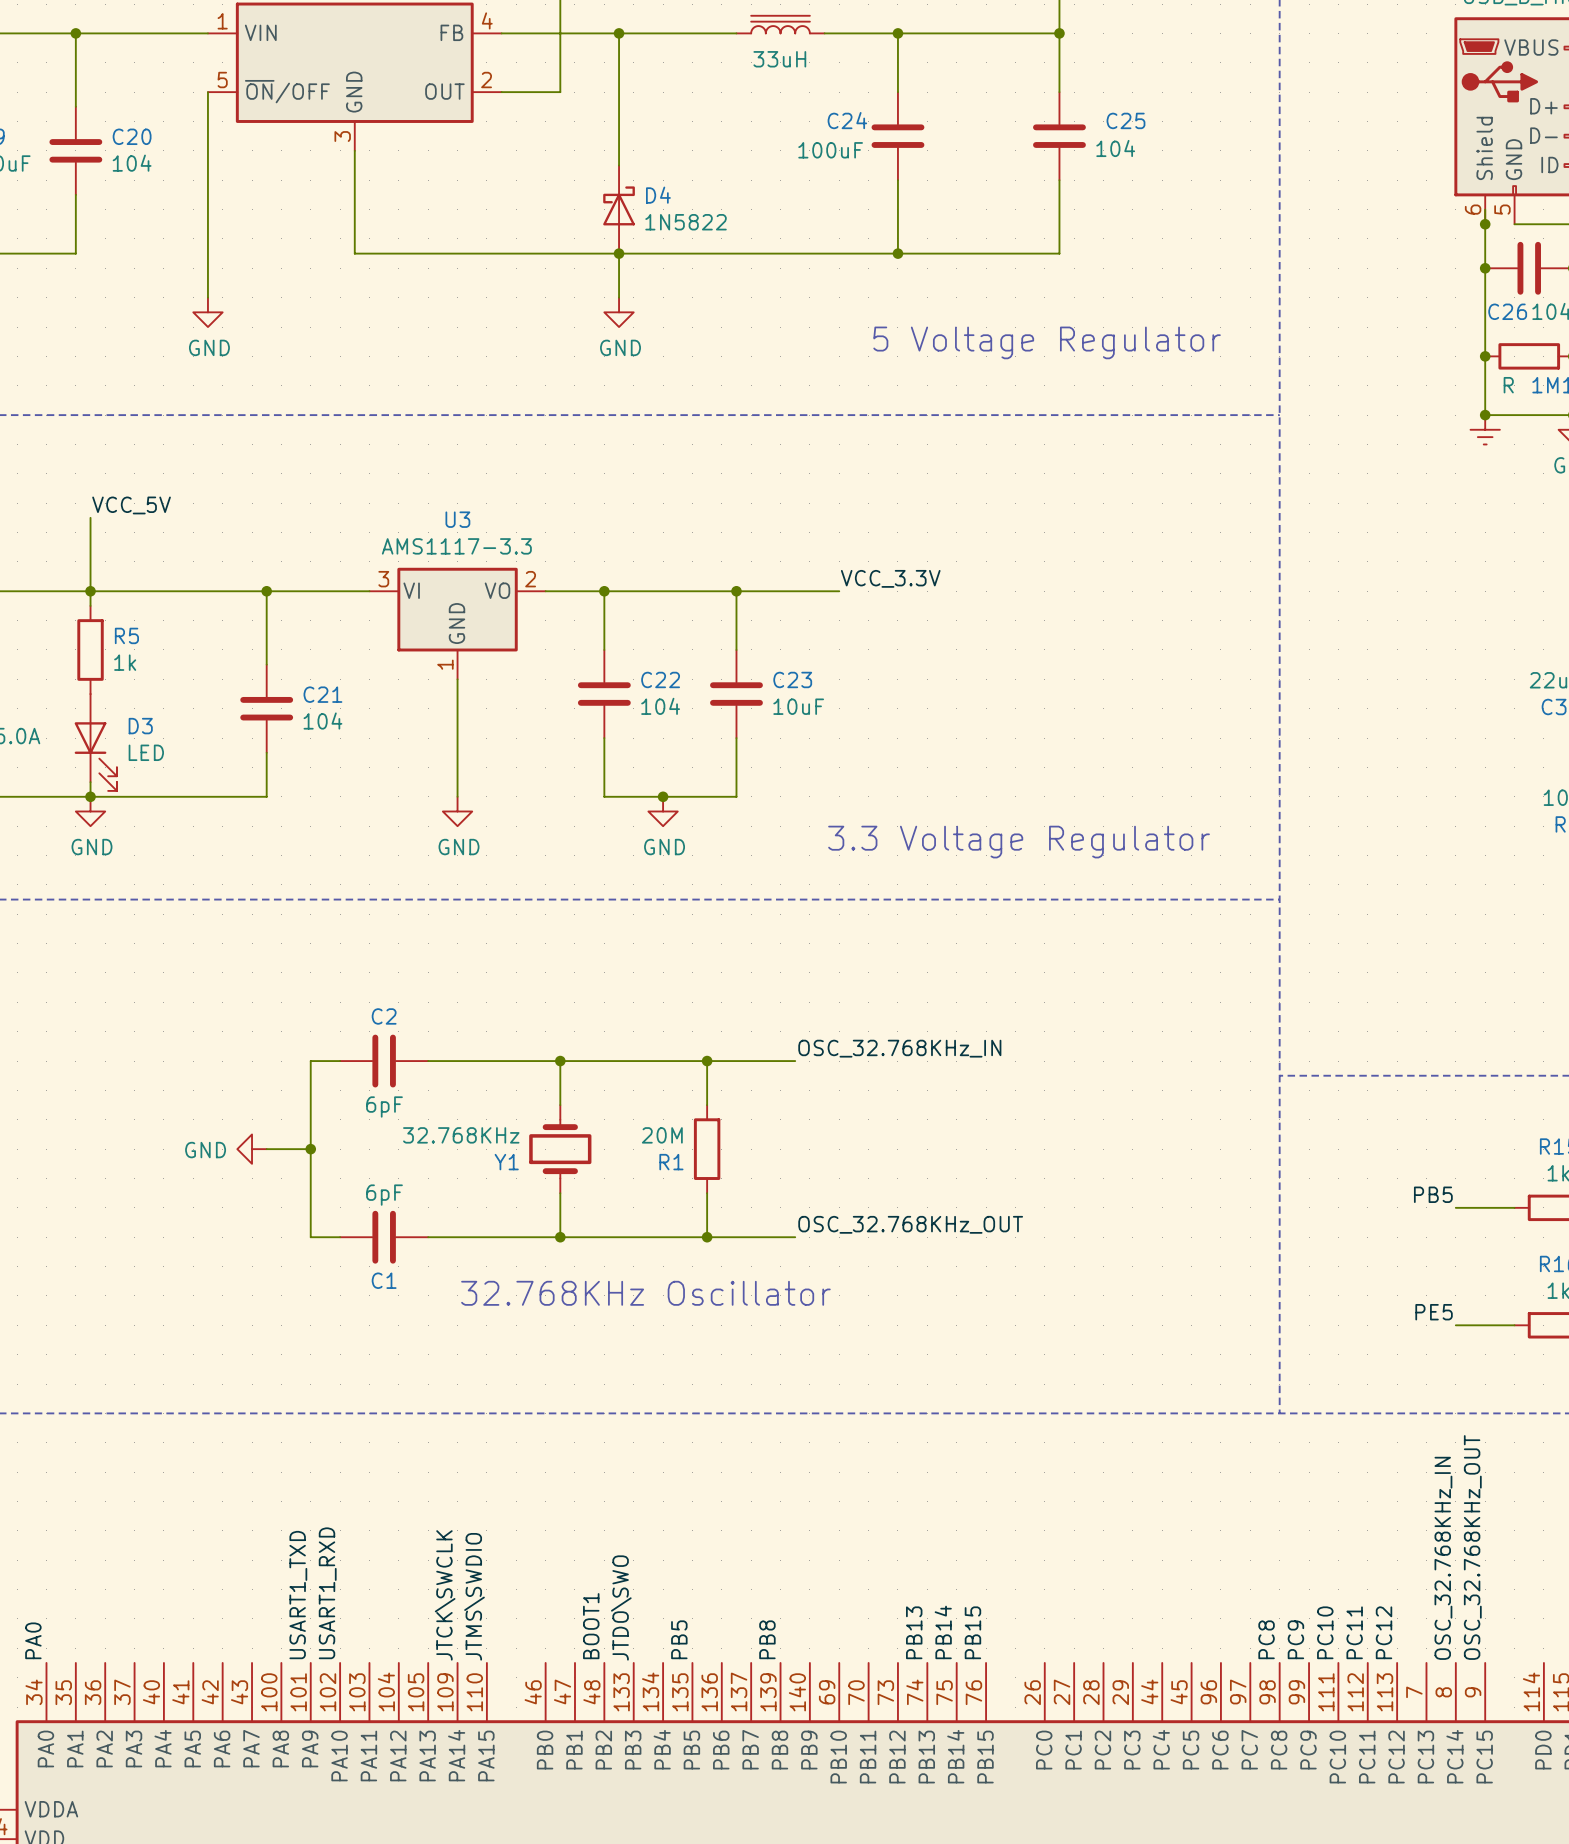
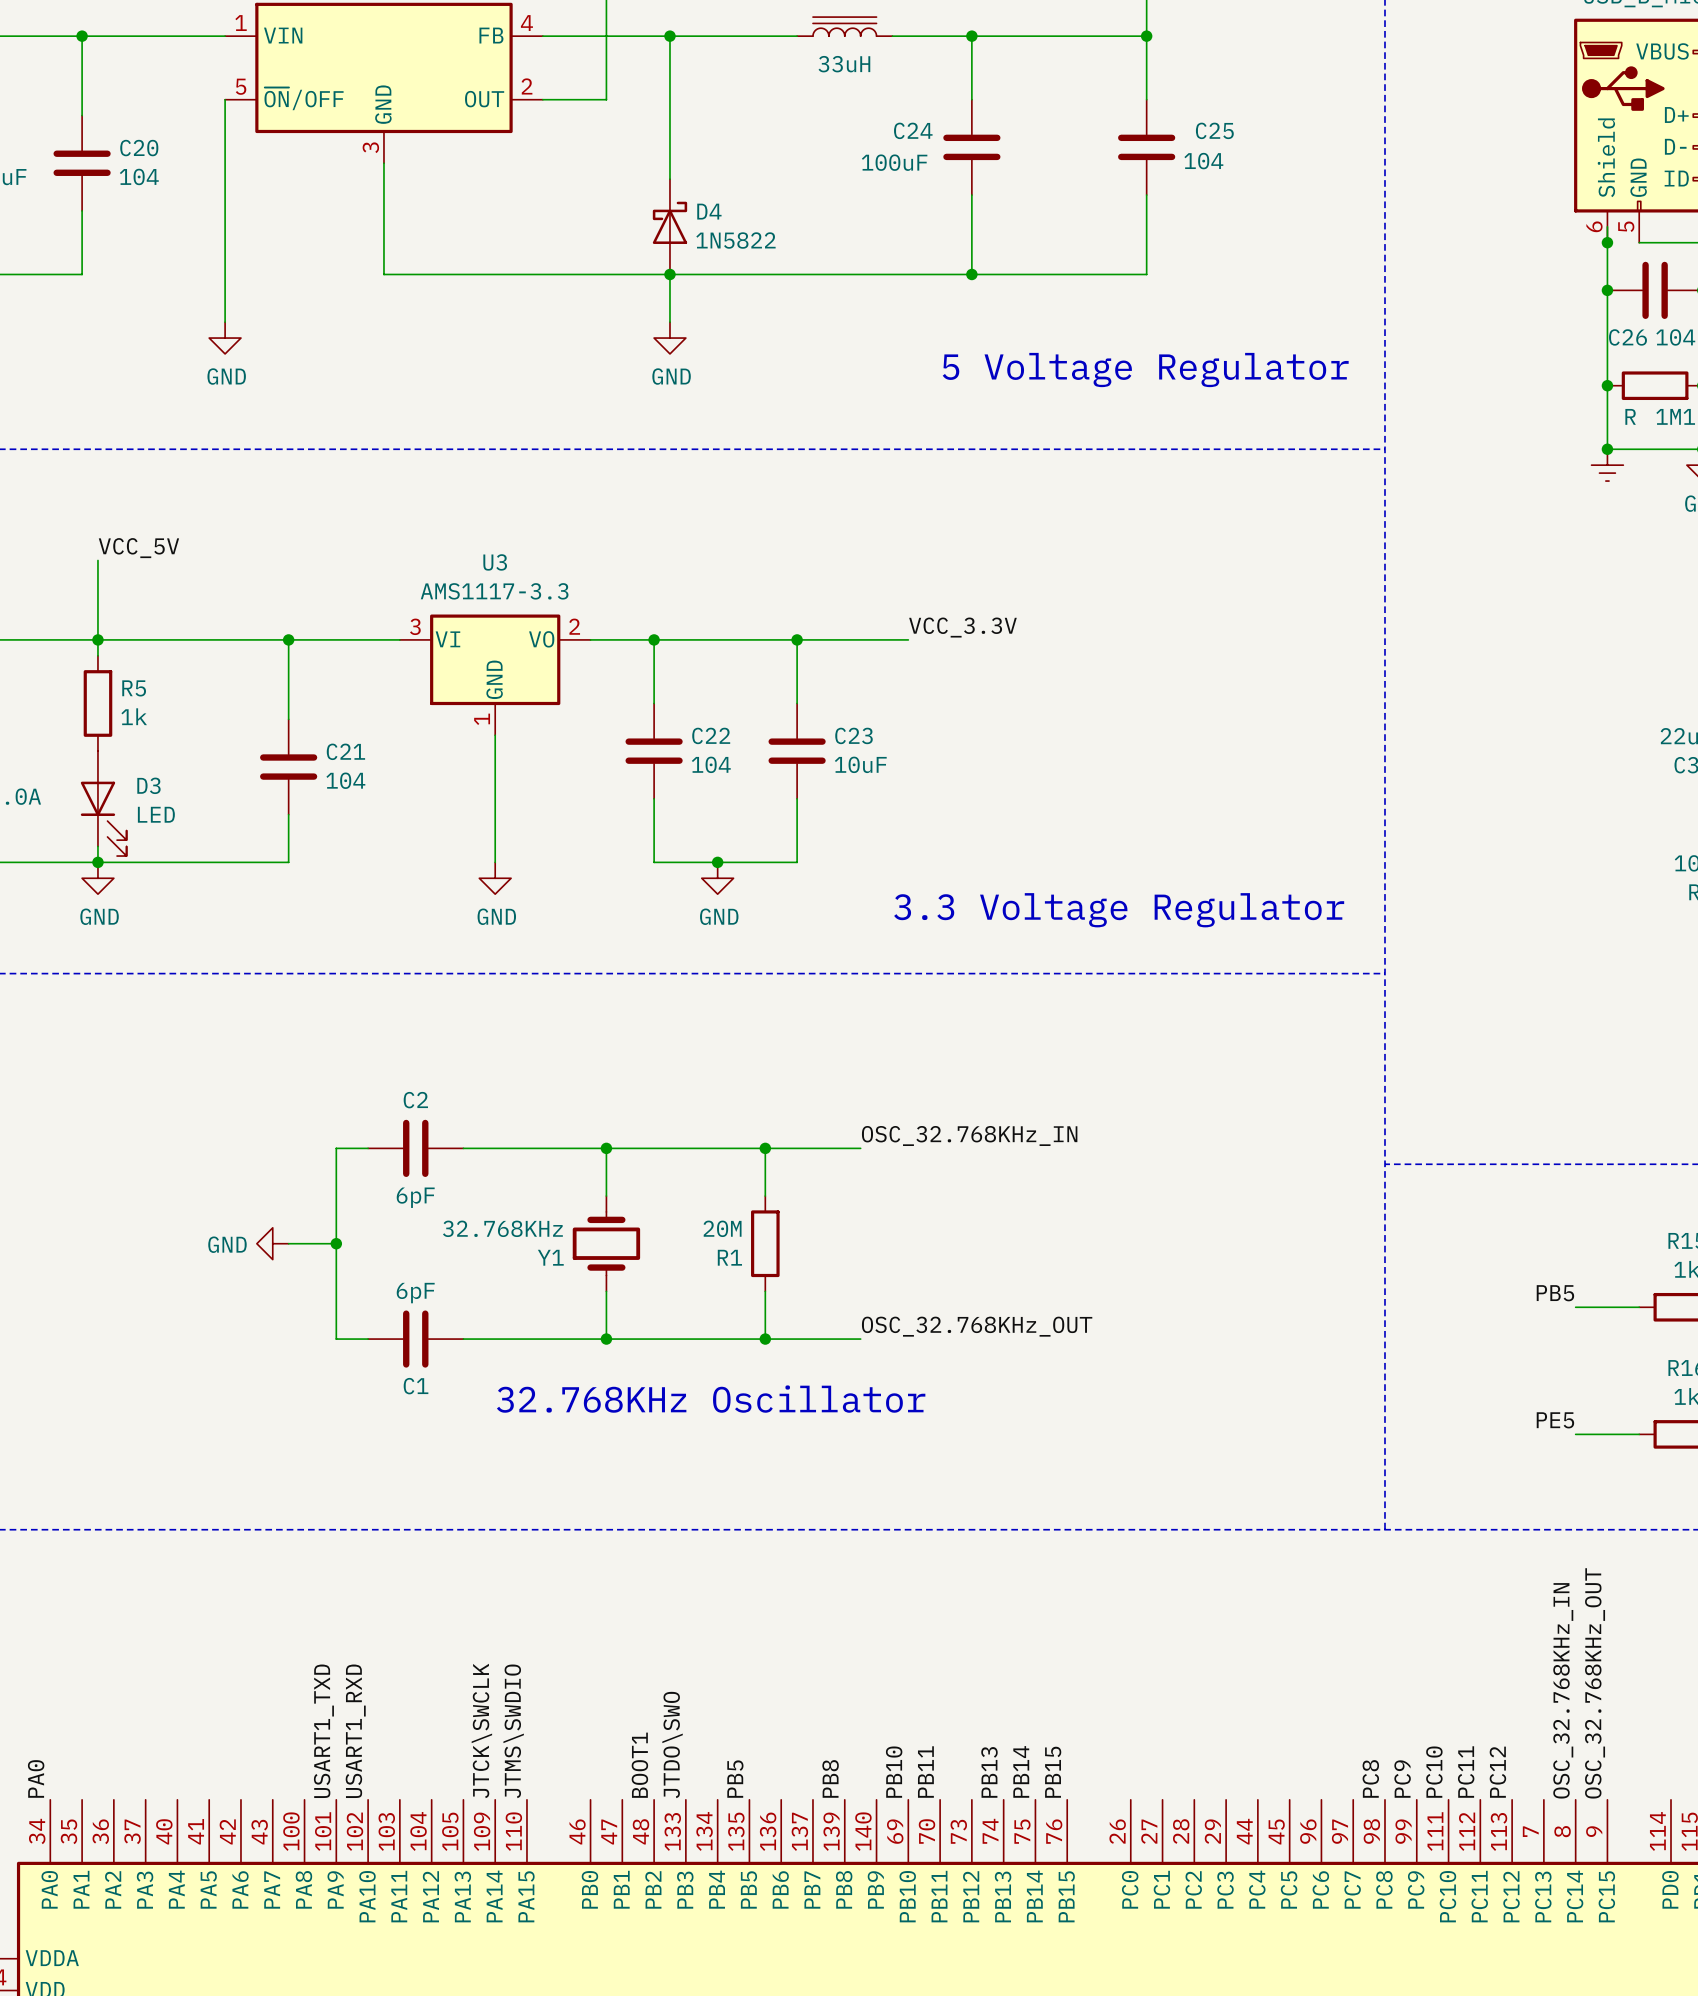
label: none -> PB10 (894, 1772)
label: none -> PB11 (925, 1772)

